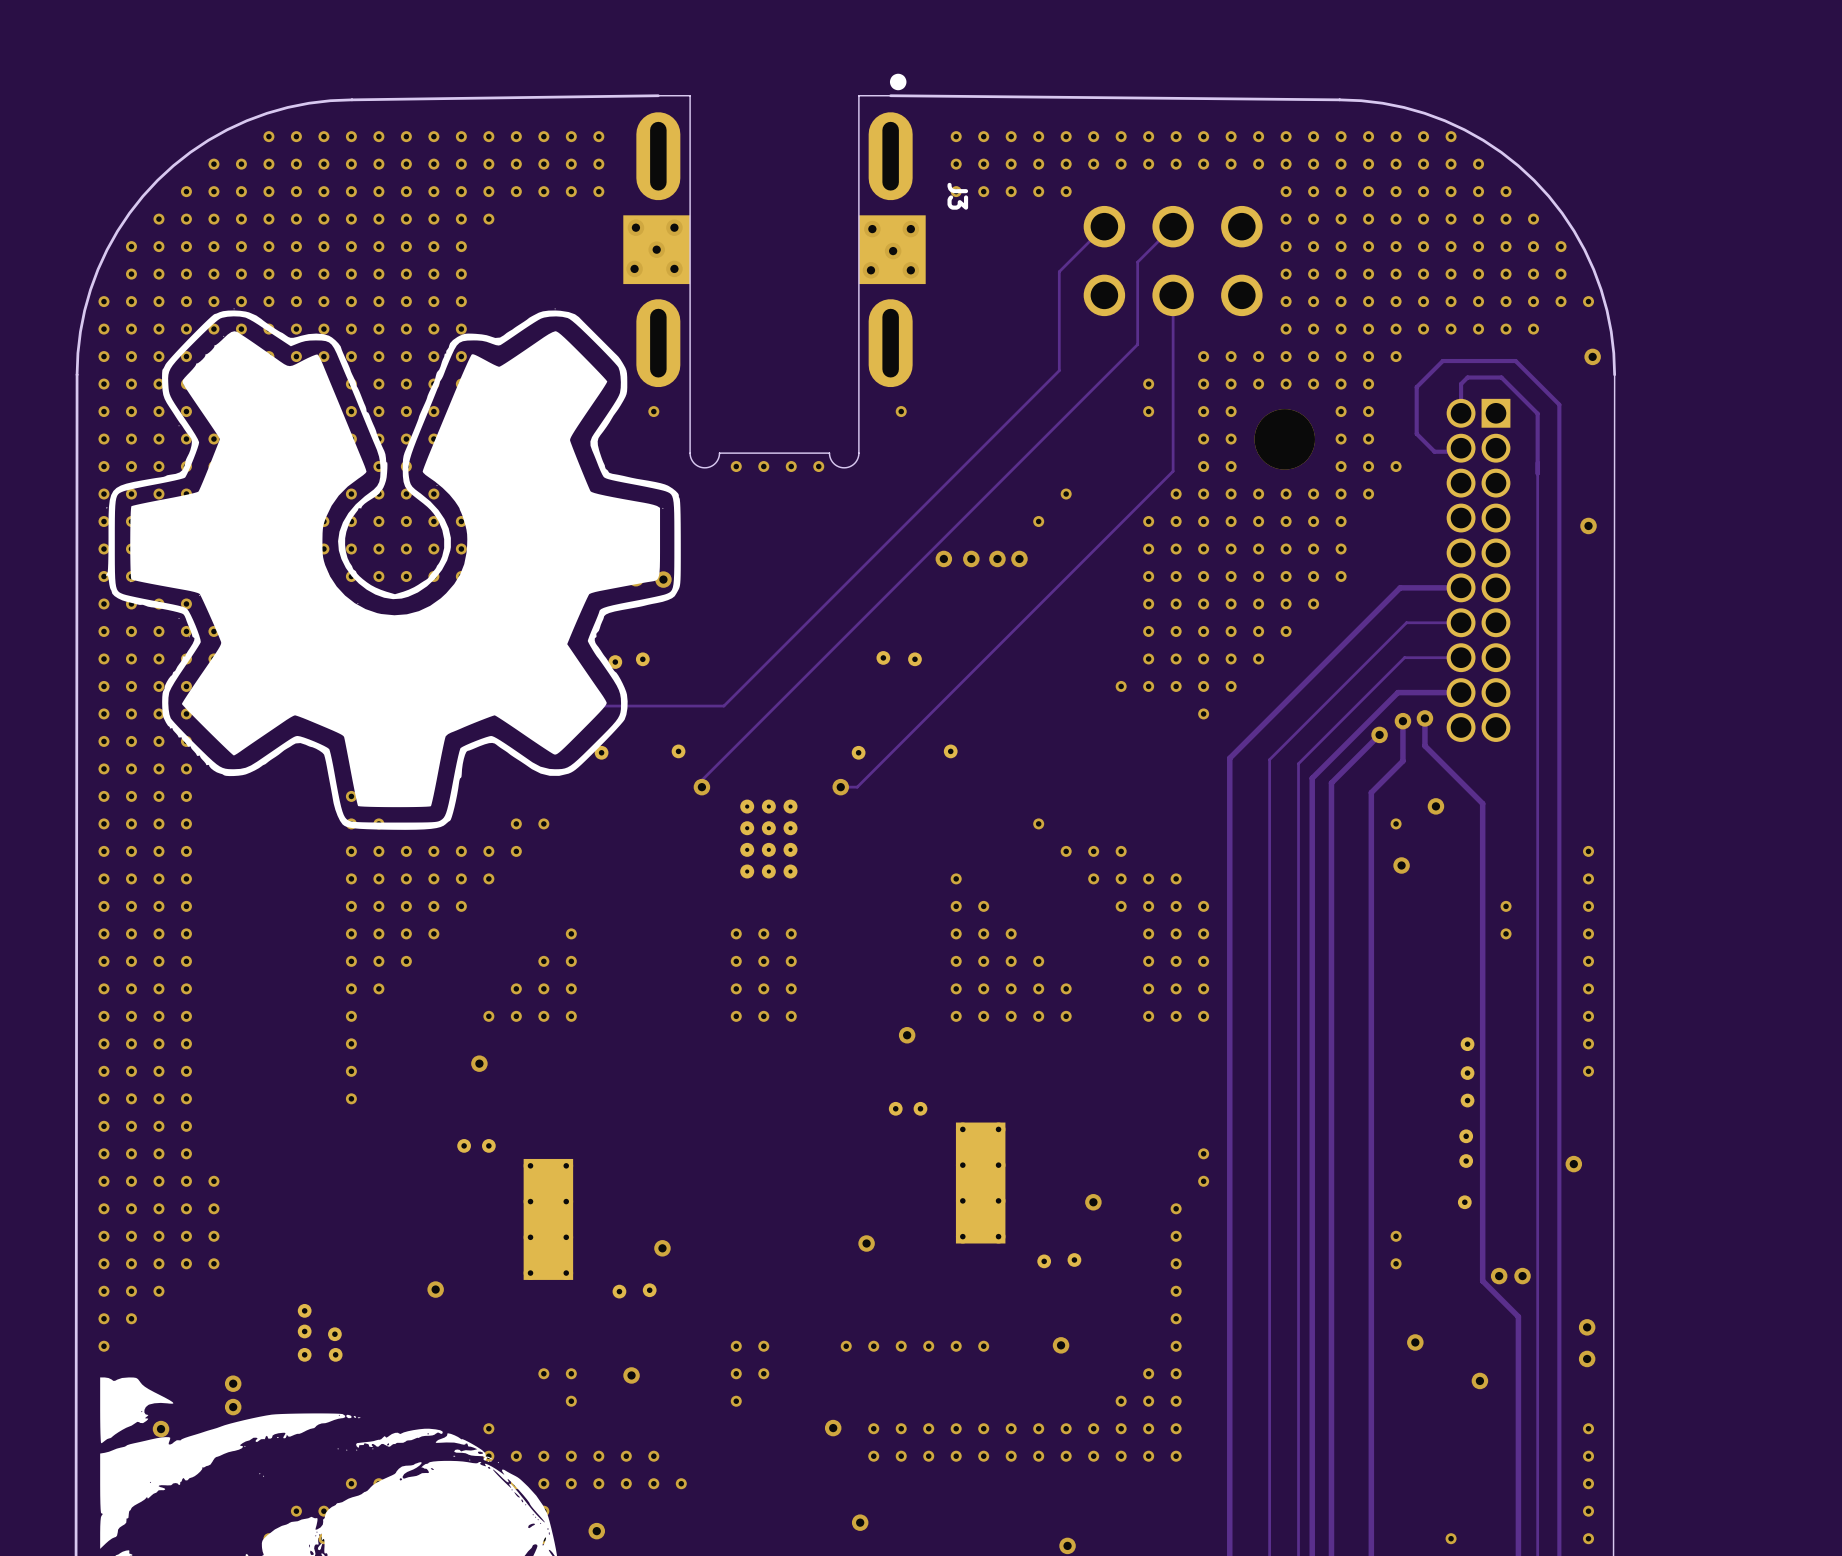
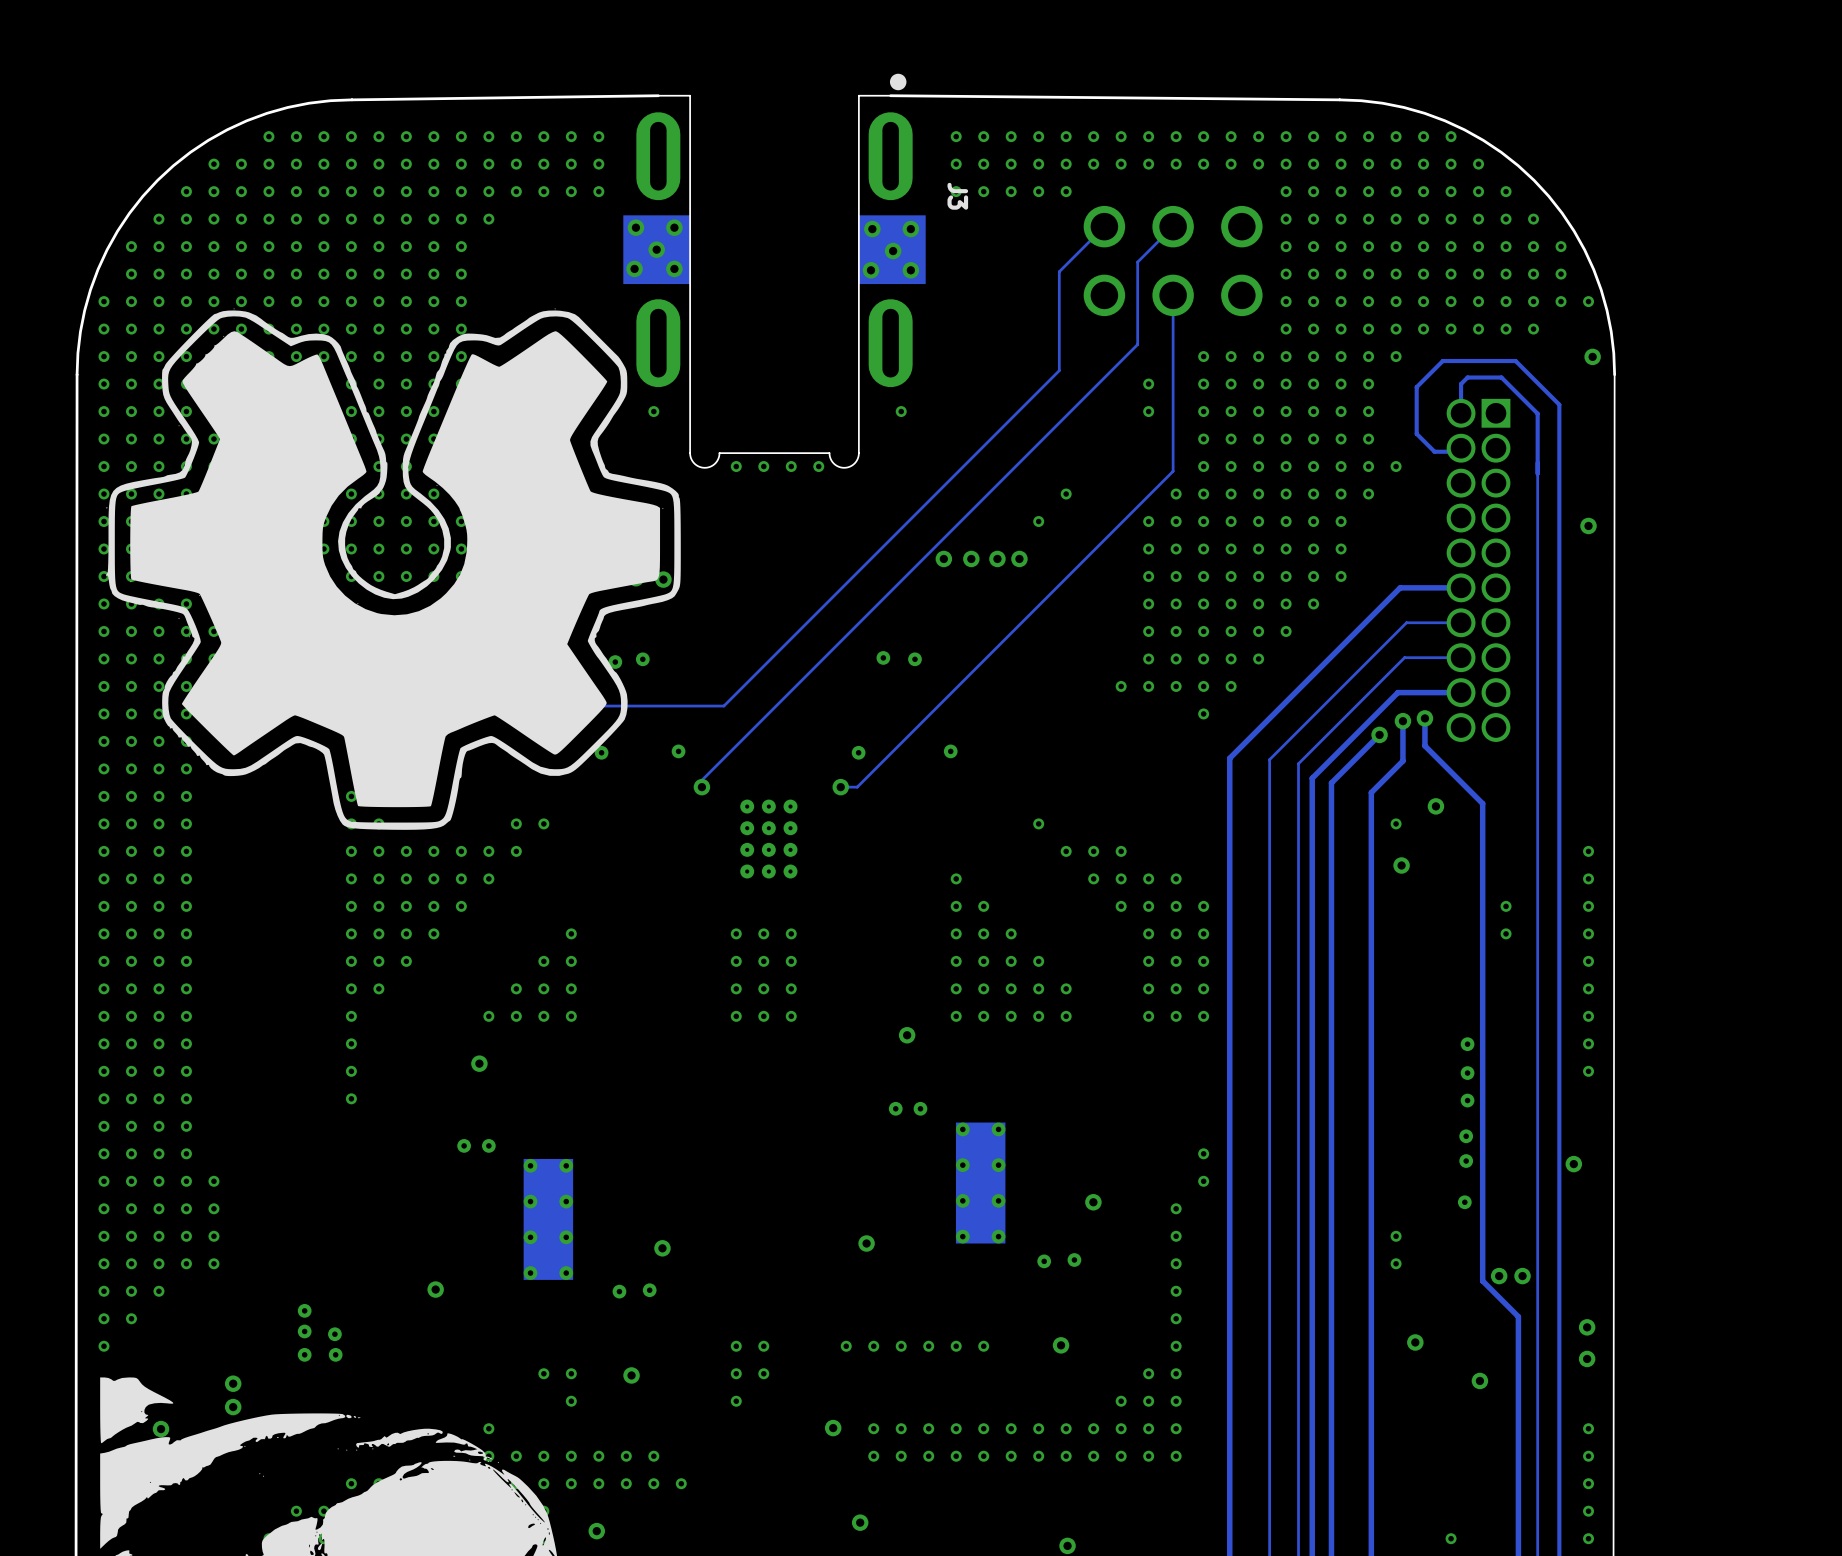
via size: [1254, 409, 1315, 470] -> [1280, 433, 1292, 445]
via: none -> (1258, 411)
via: none -> (1286, 411)
via: none -> (1313, 411)
via: none -> (1258, 439)
via: none -> (1313, 439)
via: none -> (1258, 466)
via: none -> (1286, 466)
via: none -> (1313, 466)

